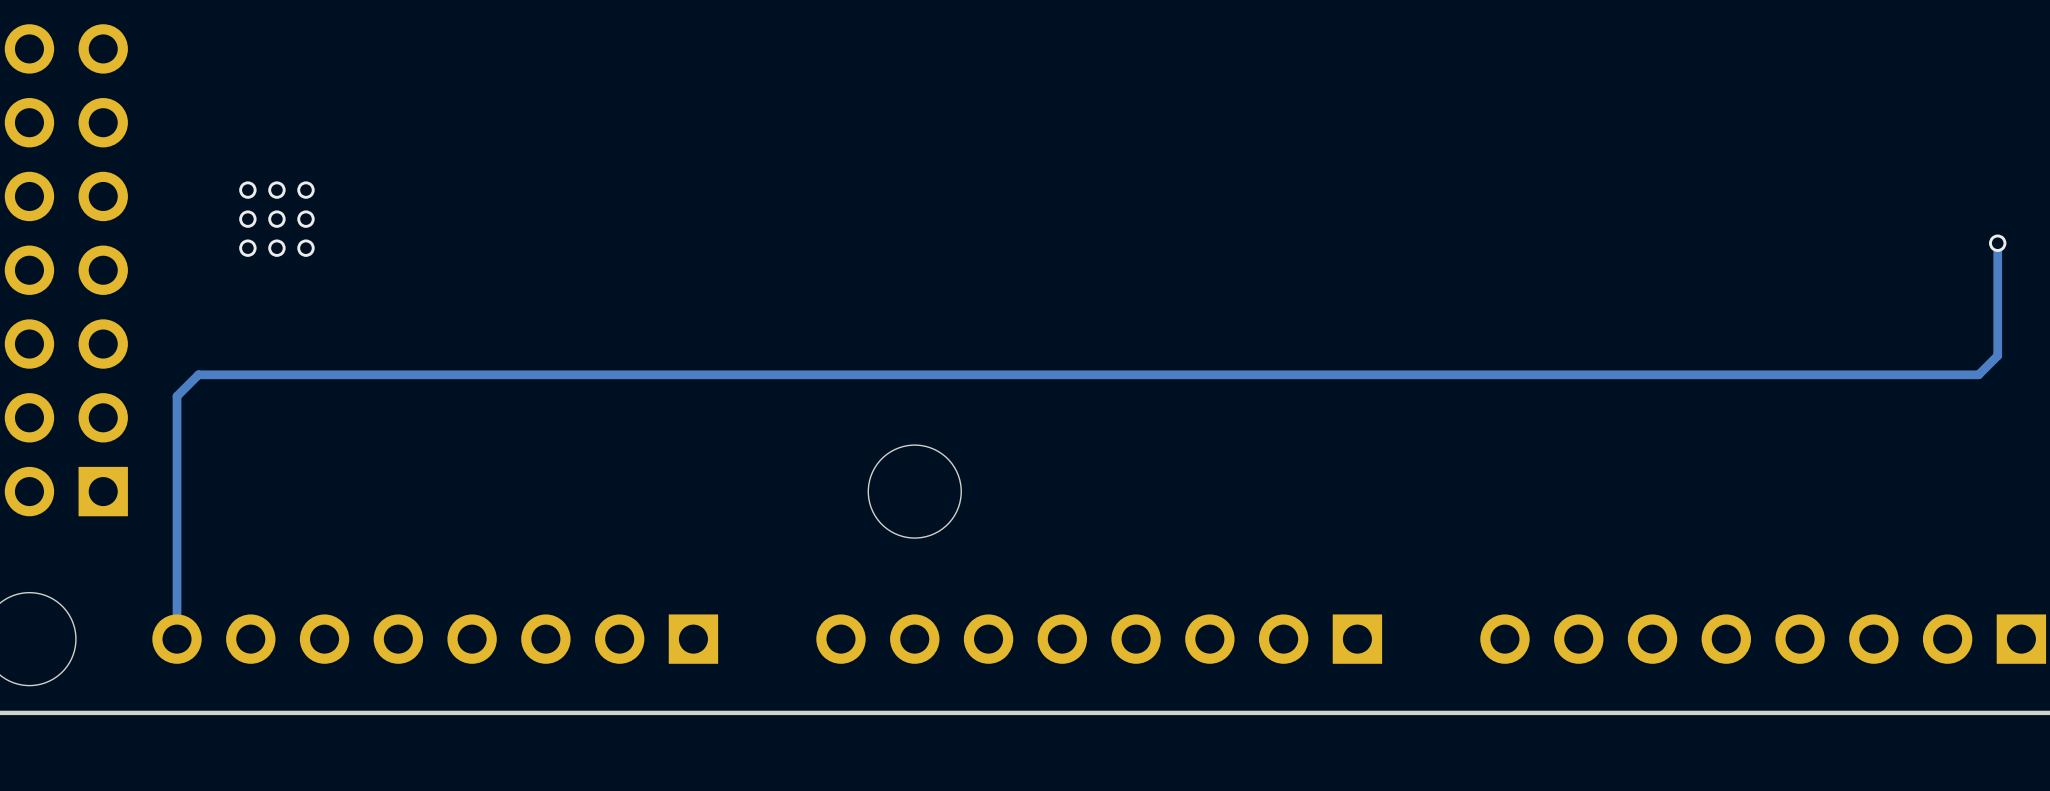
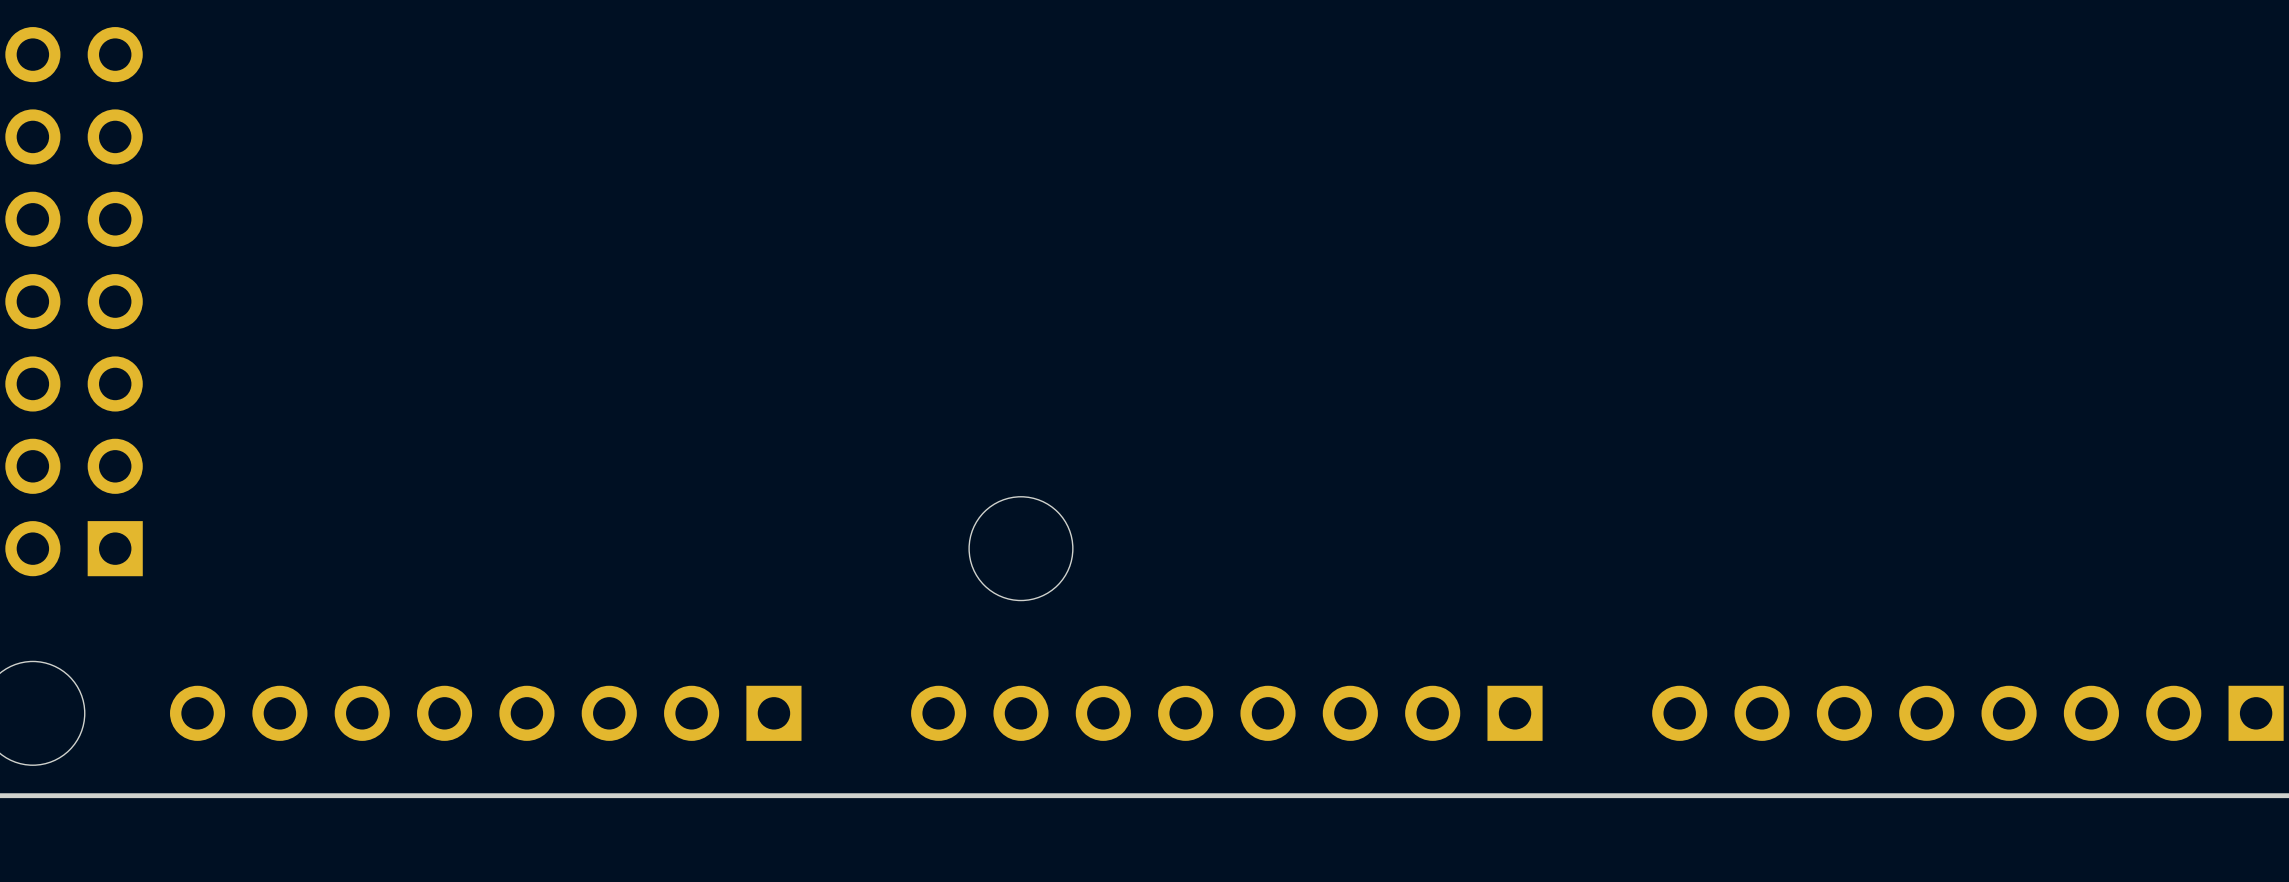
via: (247, 190) -> none
via: (276, 190) -> none
via: (305, 190) -> none
via: (247, 219) -> none
via: (276, 219) -> none
via: (305, 219) -> none
track: (1997, 243) (1997, 355) (1978, 374) (198, 374) (177, 396) (177, 639) -> none
via: (1997, 243) -> none
via: (247, 248) -> none
via: (276, 248) -> none
via: (305, 248) -> none

